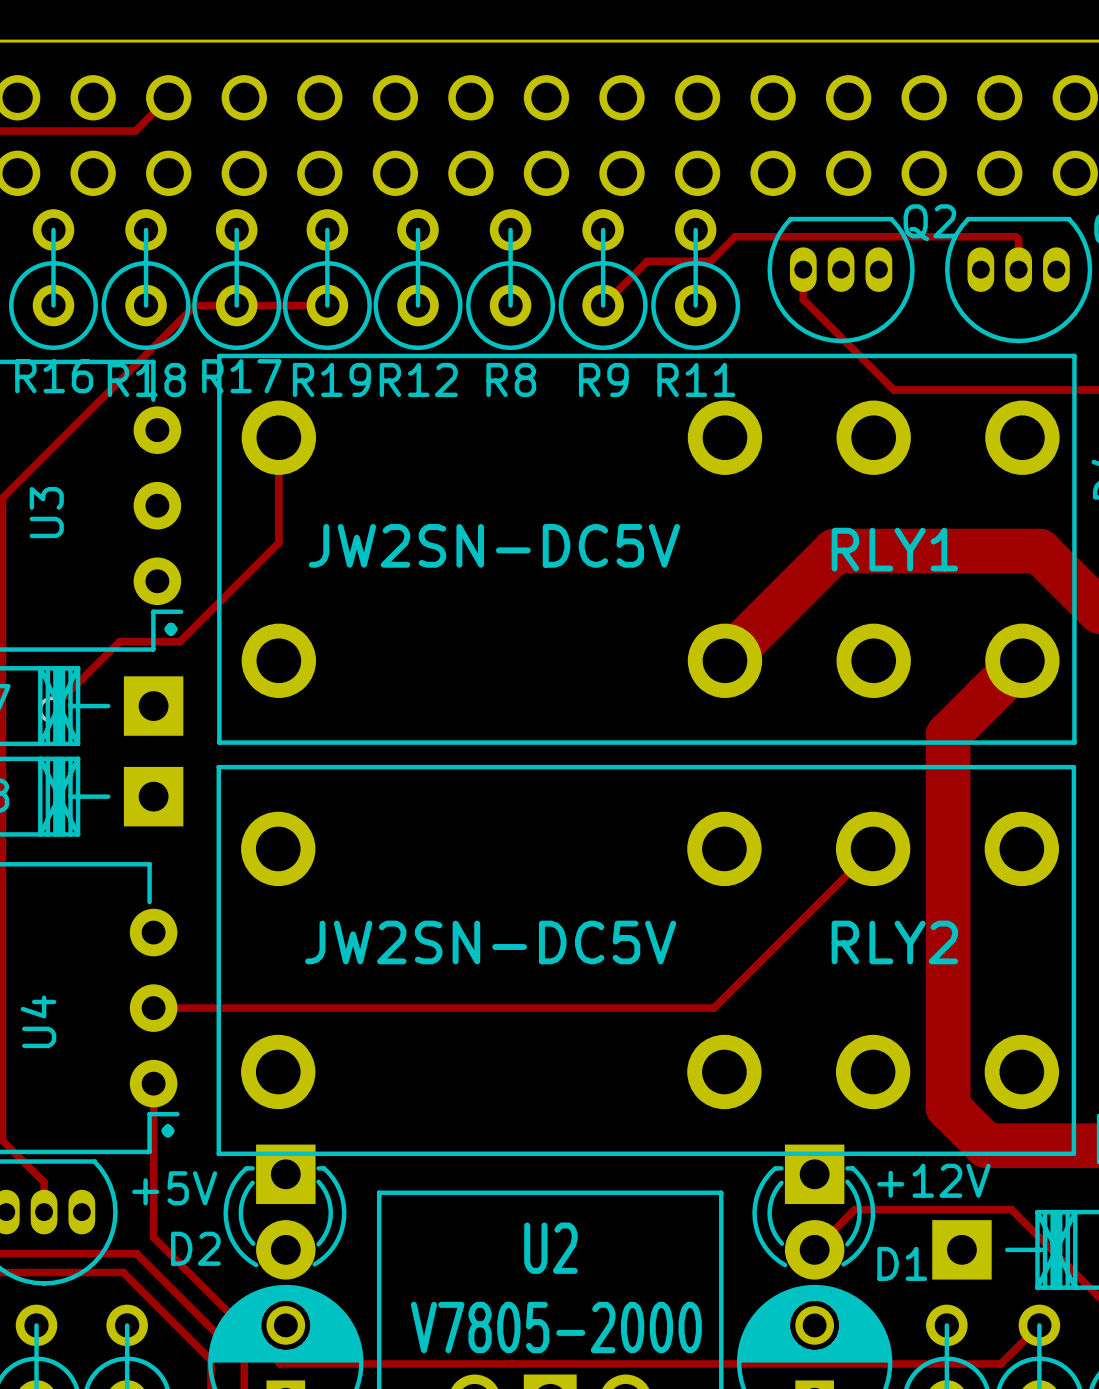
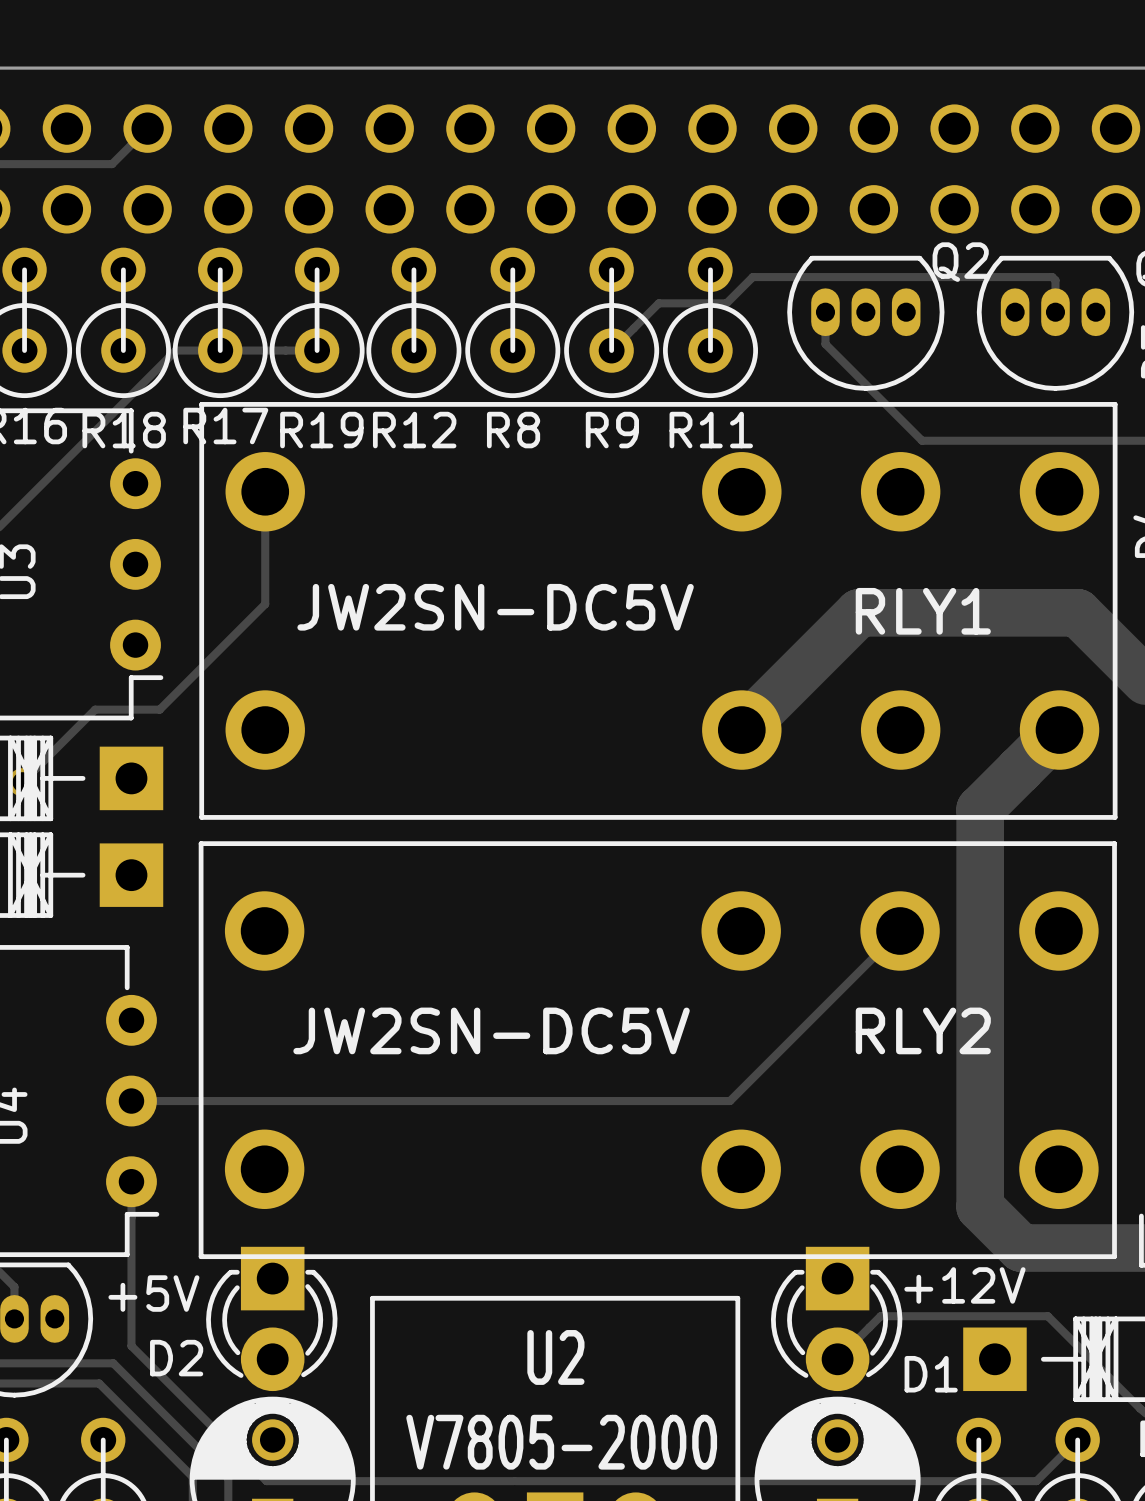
text: . (170, 629) -> none
text: . (167, 1130) -> none

